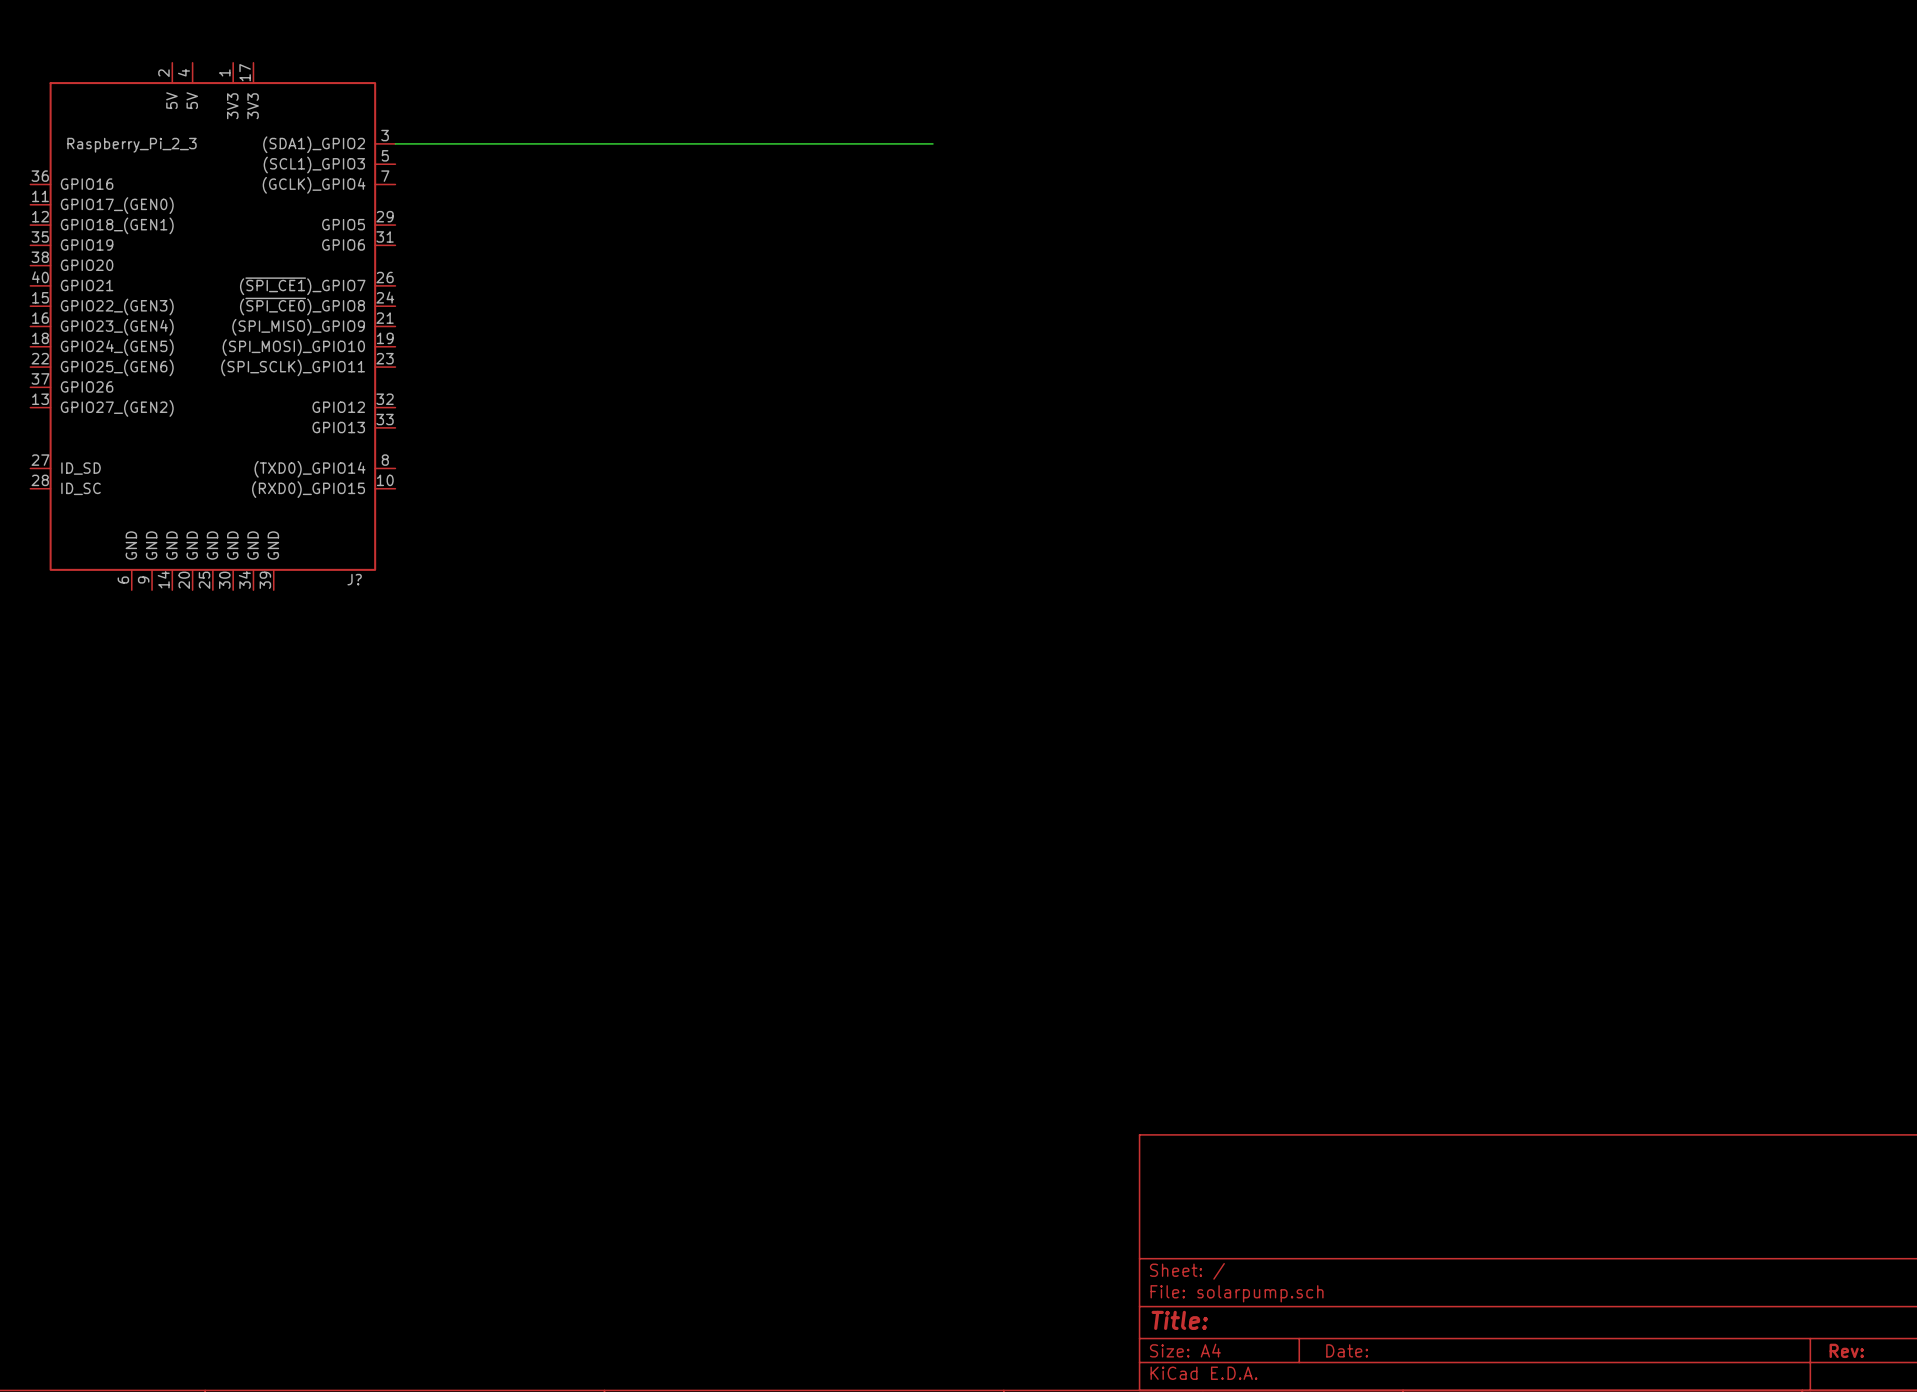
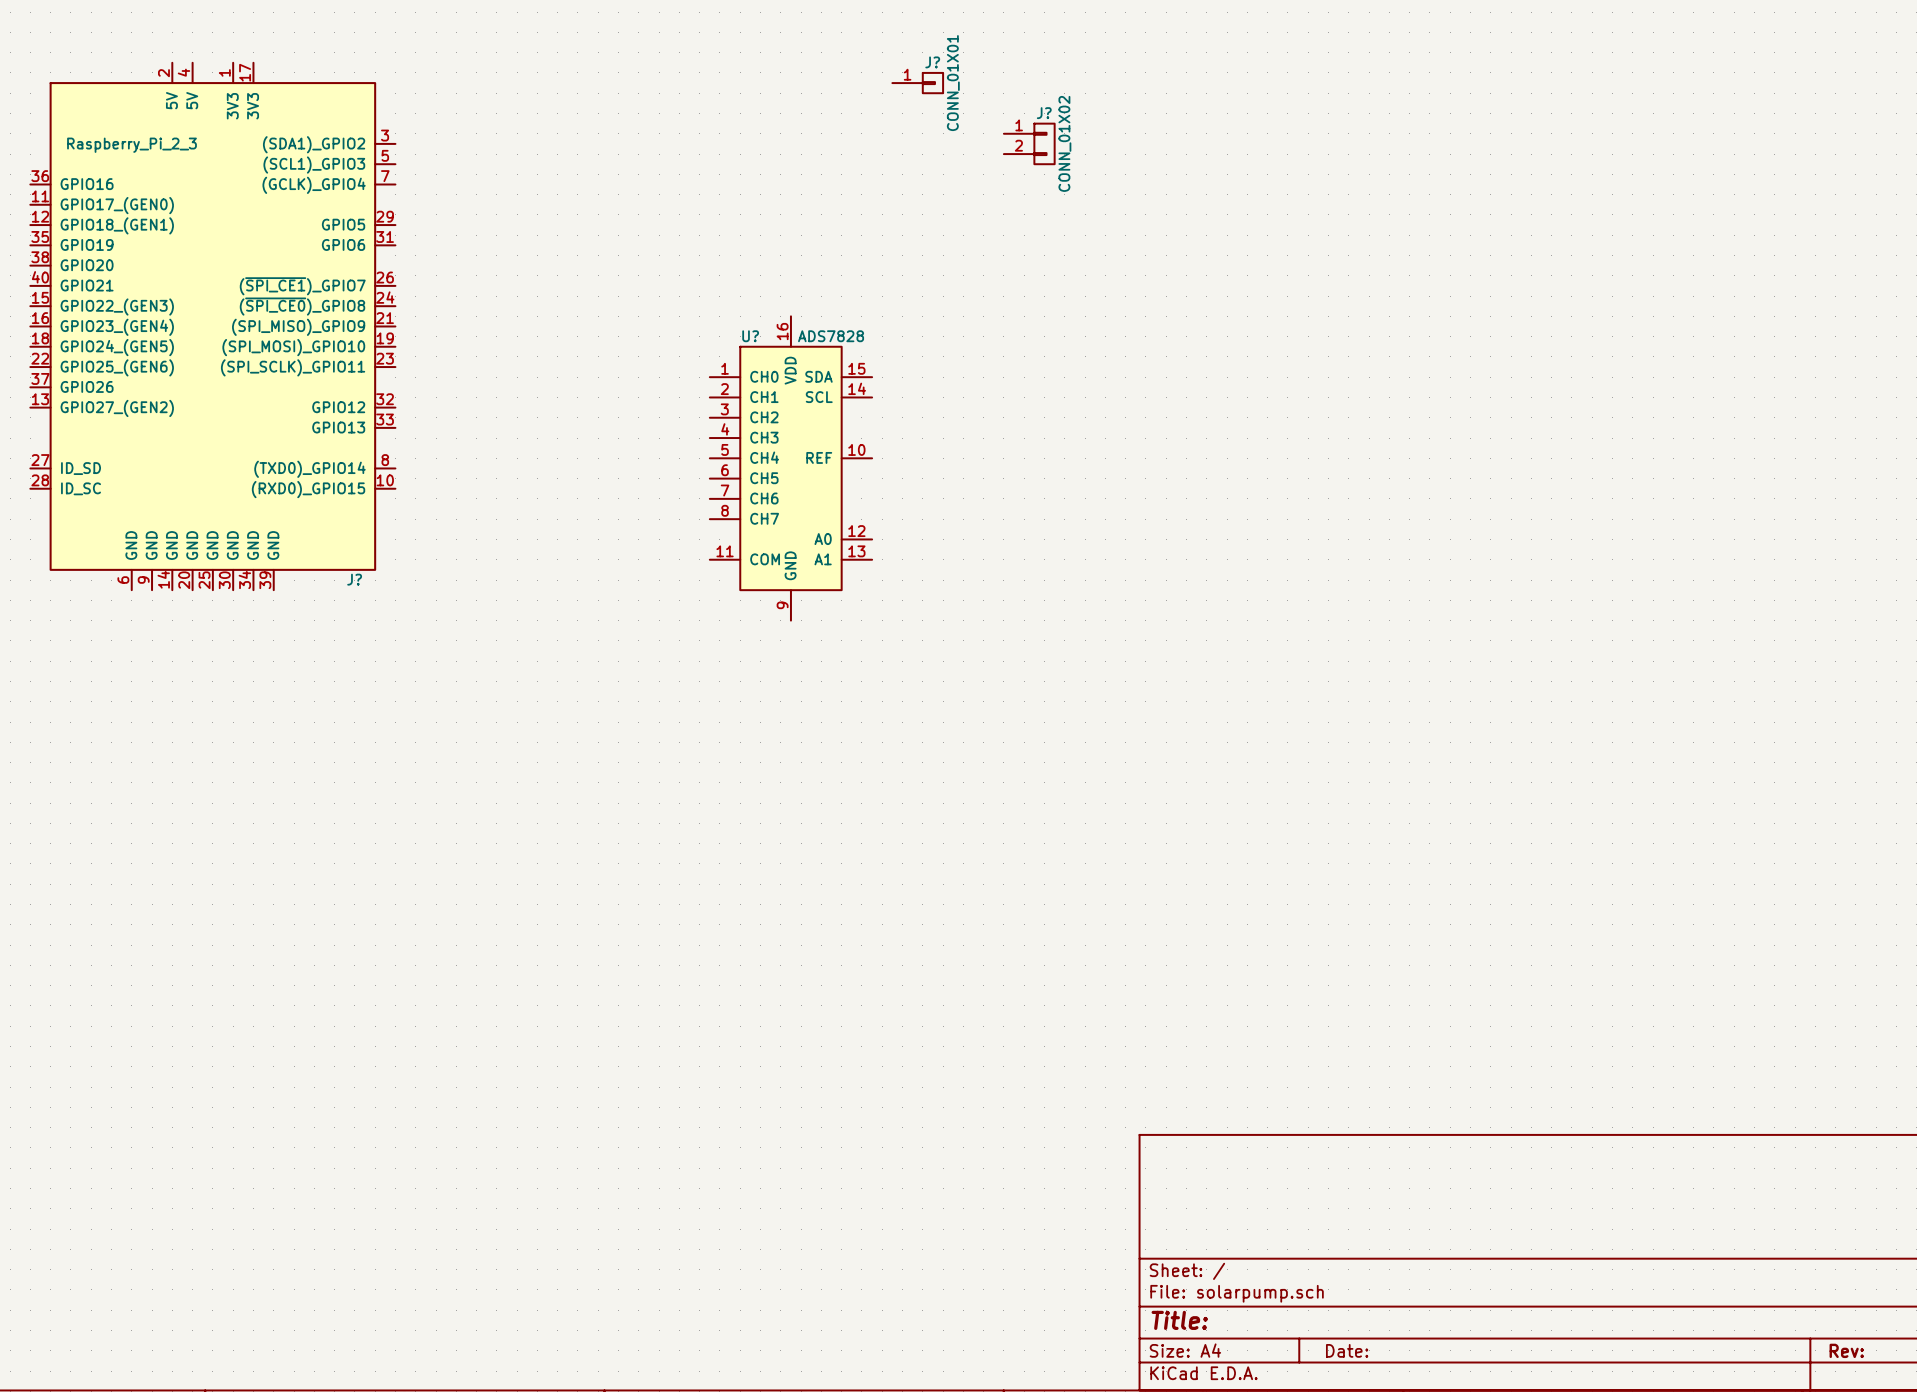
J?: none -> CONN_01X01 (917, 83)
wire: (395, 143) (932, 143) -> none
J?: none -> CONN_01X02 (1029, 143)
U?: none -> ADS7828 (790, 468)

